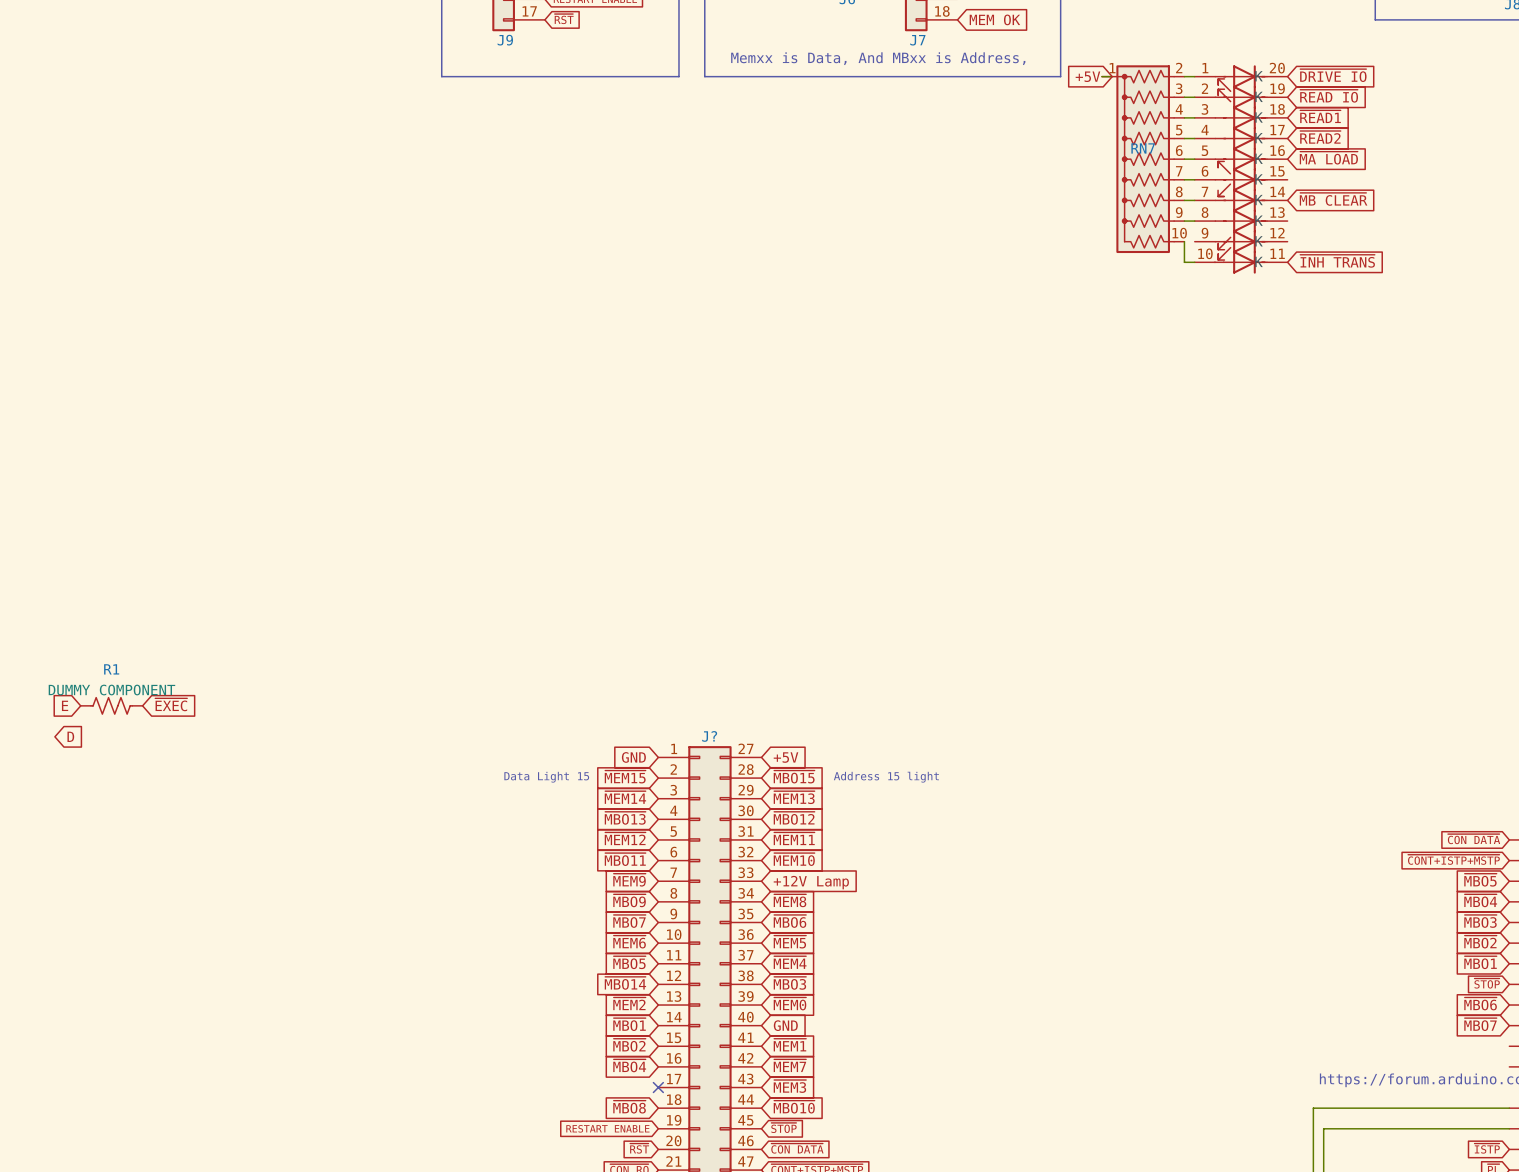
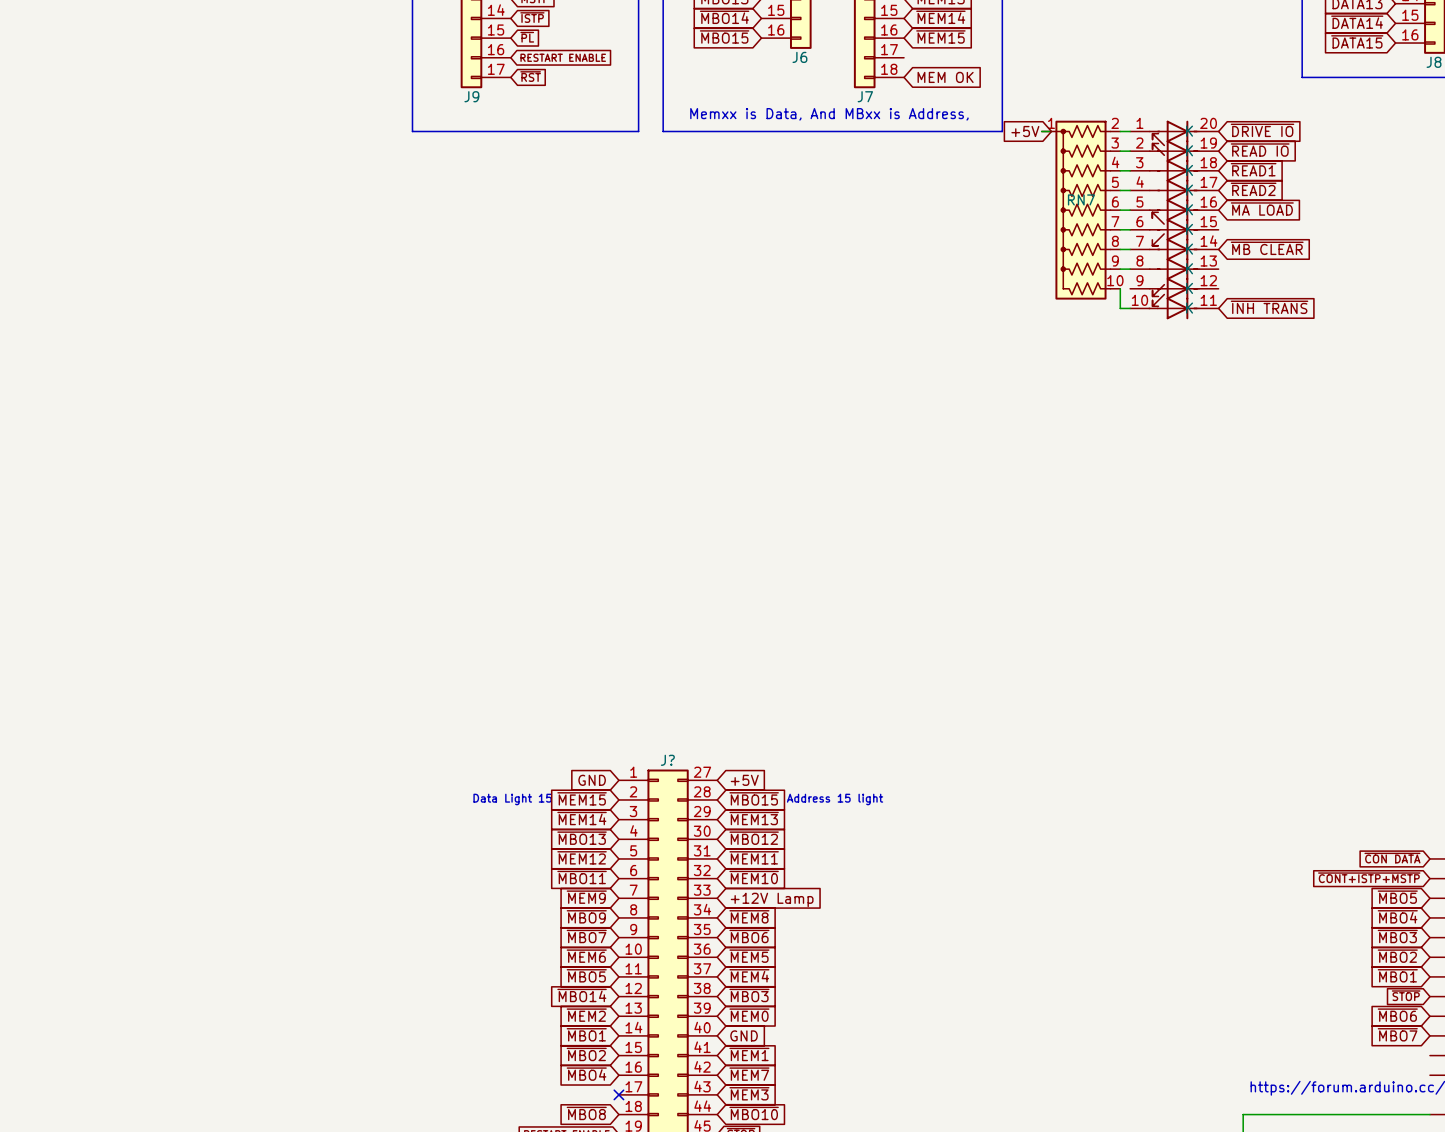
global label: ~{EXEC} (171, 704) -> none
global label: E (65, 705) -> none
R1: DUMMY COMPONENT (111, 705) -> none
global label: D (70, 736) -> none

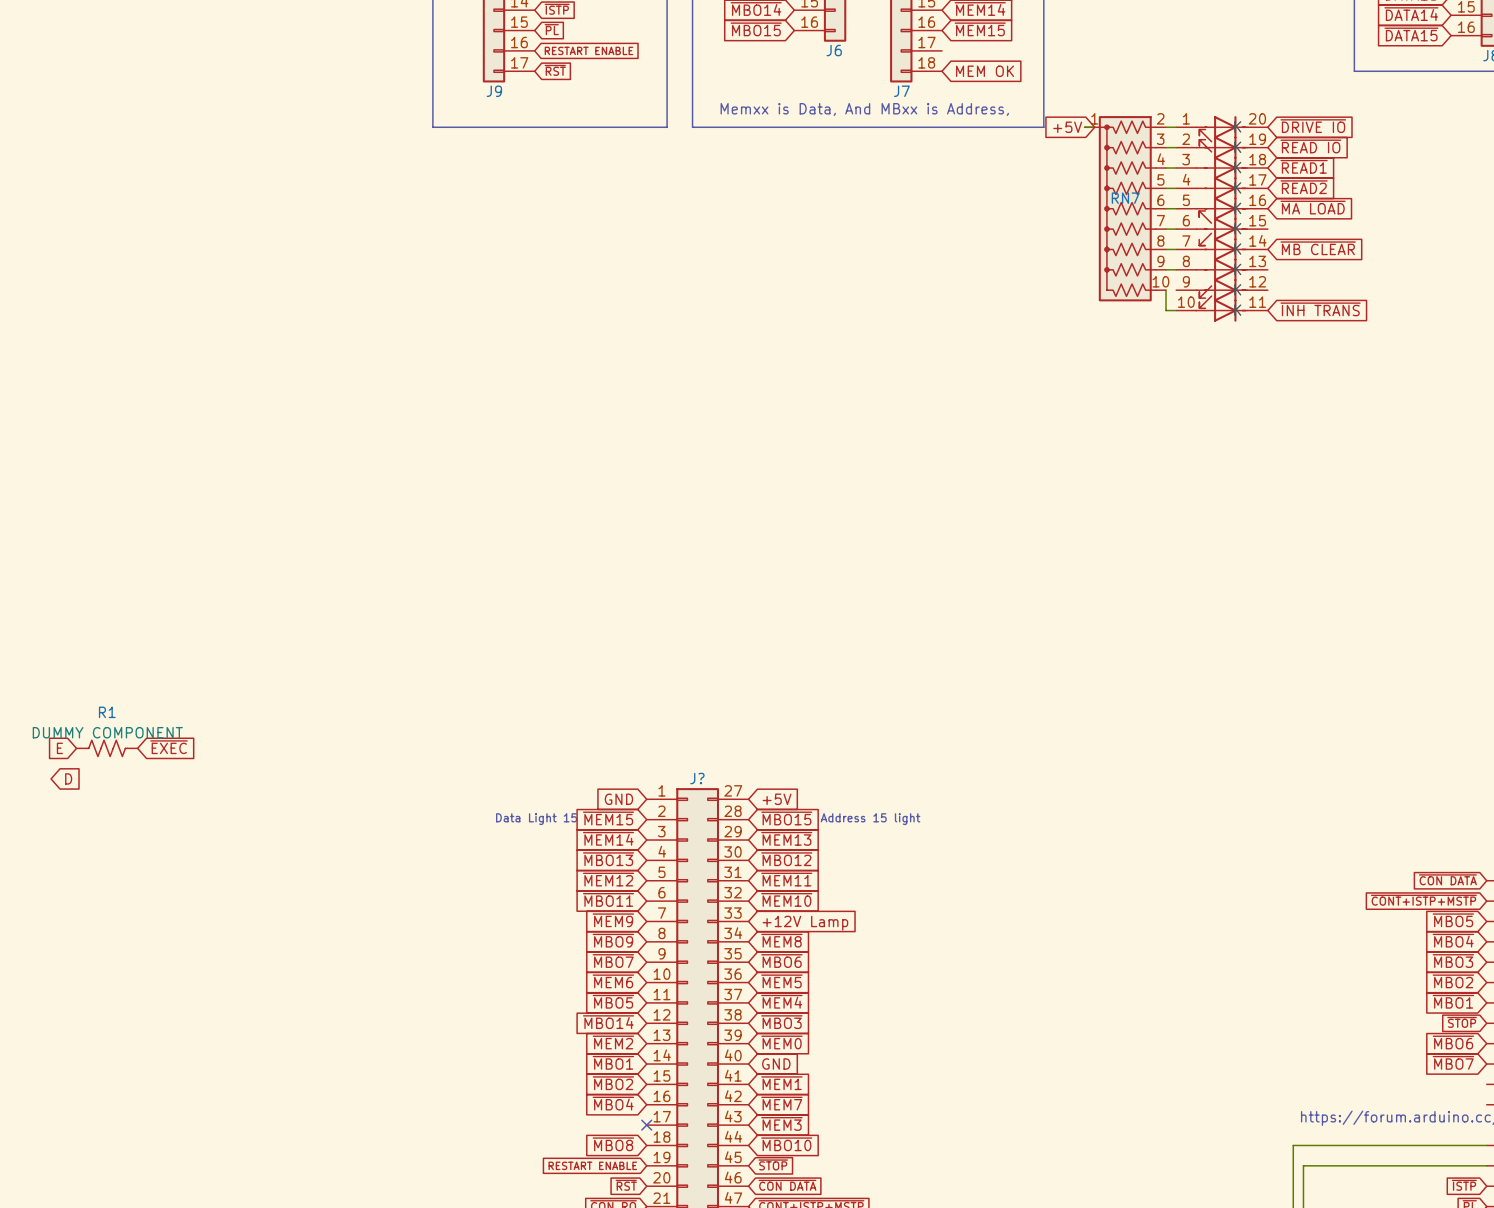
global label: none -> ~{EXEC} (169, 747)
global label: none -> E (59, 748)
R1: none -> DUMMY COMPONENT (107, 748)
global label: none -> D (68, 778)

